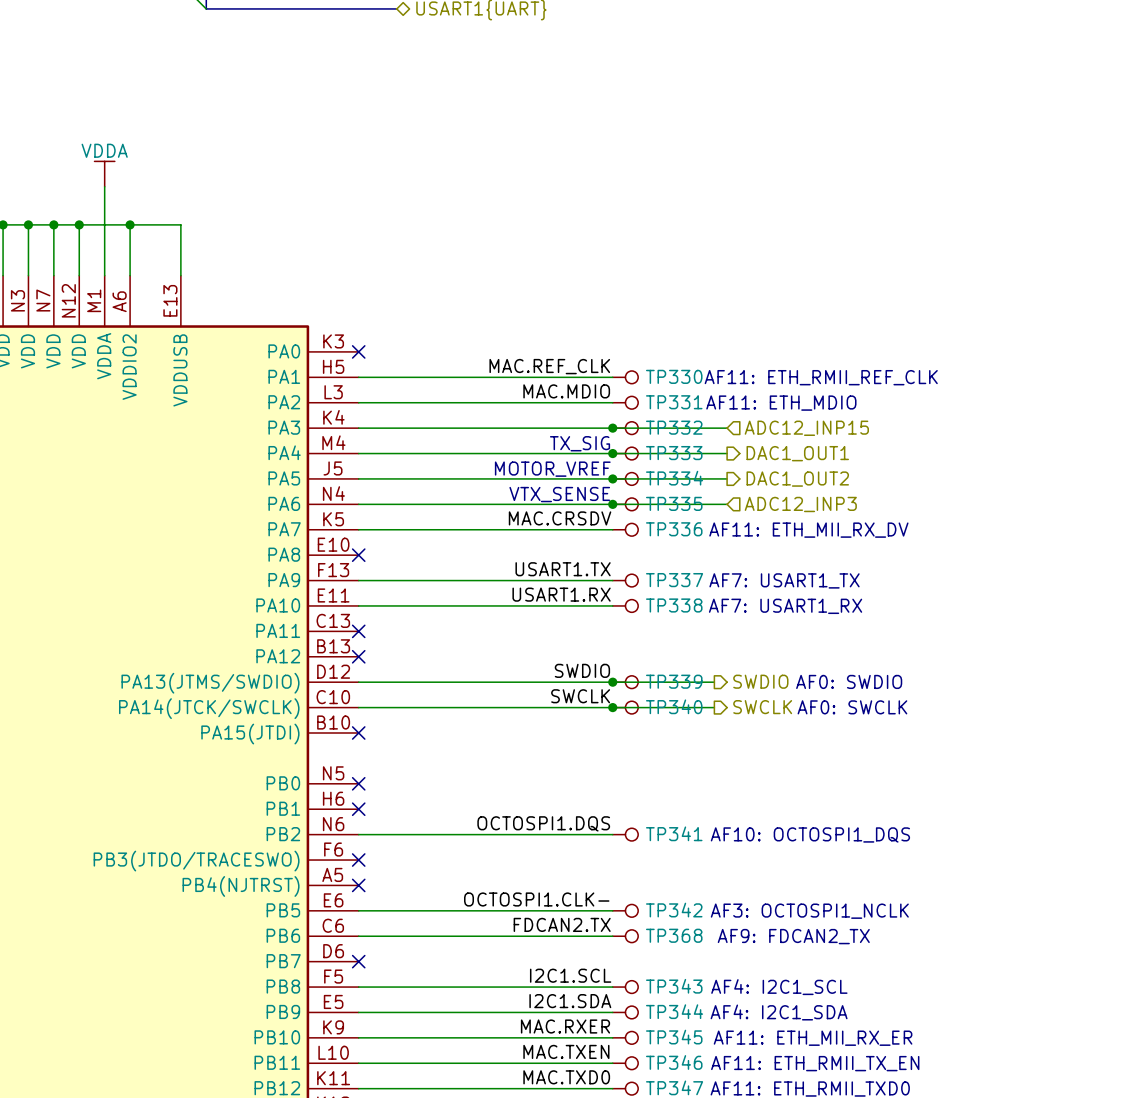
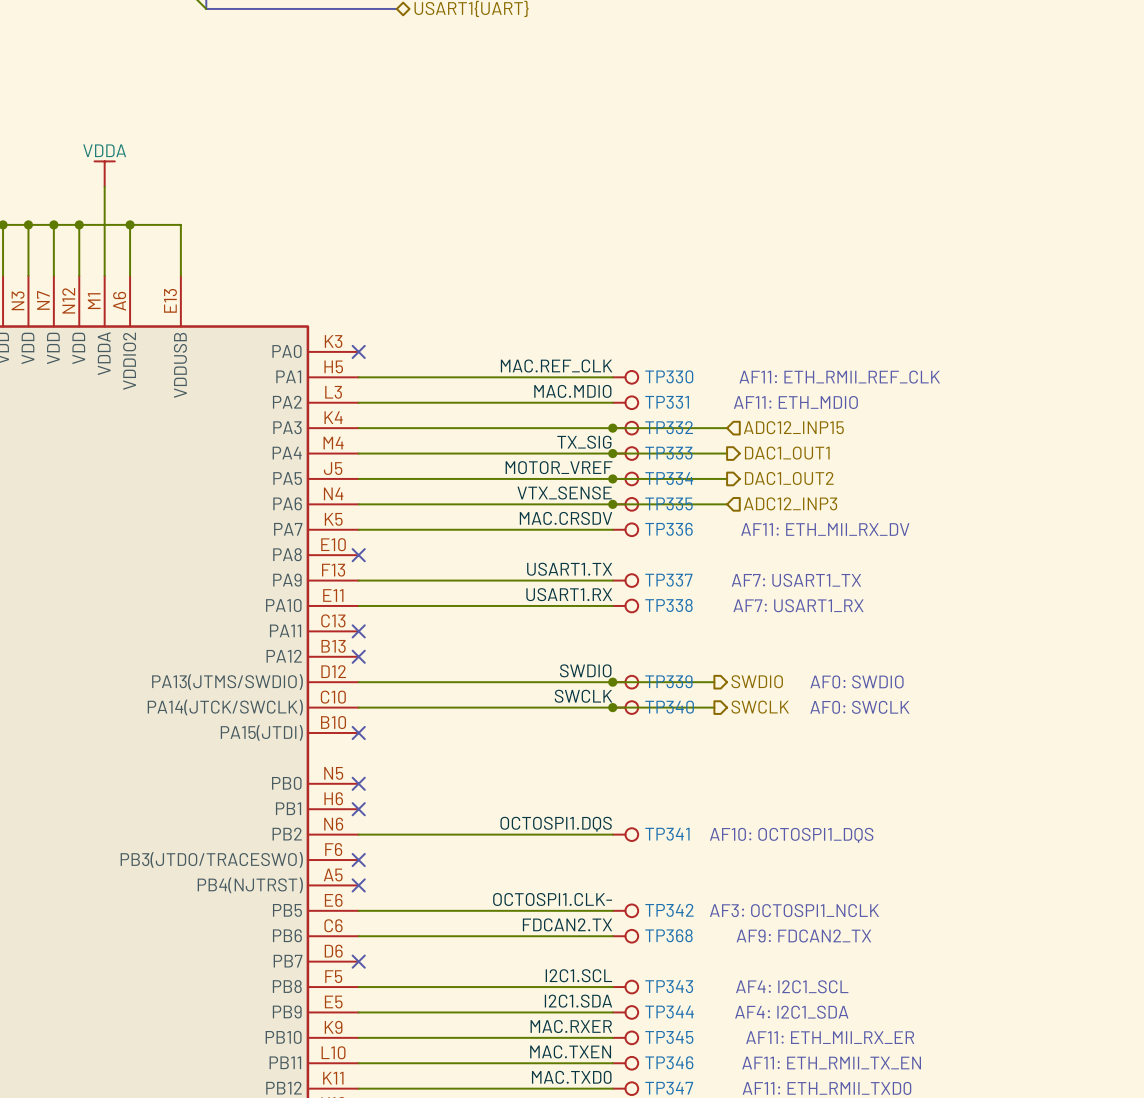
label: none -> TX_SIG (584, 442)
text: TX_SIG (580, 443) -> none
label: none -> MOTOR_VREF (558, 467)
text: MOTOR_VREF (552, 469) -> none
label: none -> VTX_SENSE (564, 493)
text: VTX_SENSE (559, 494) -> none

